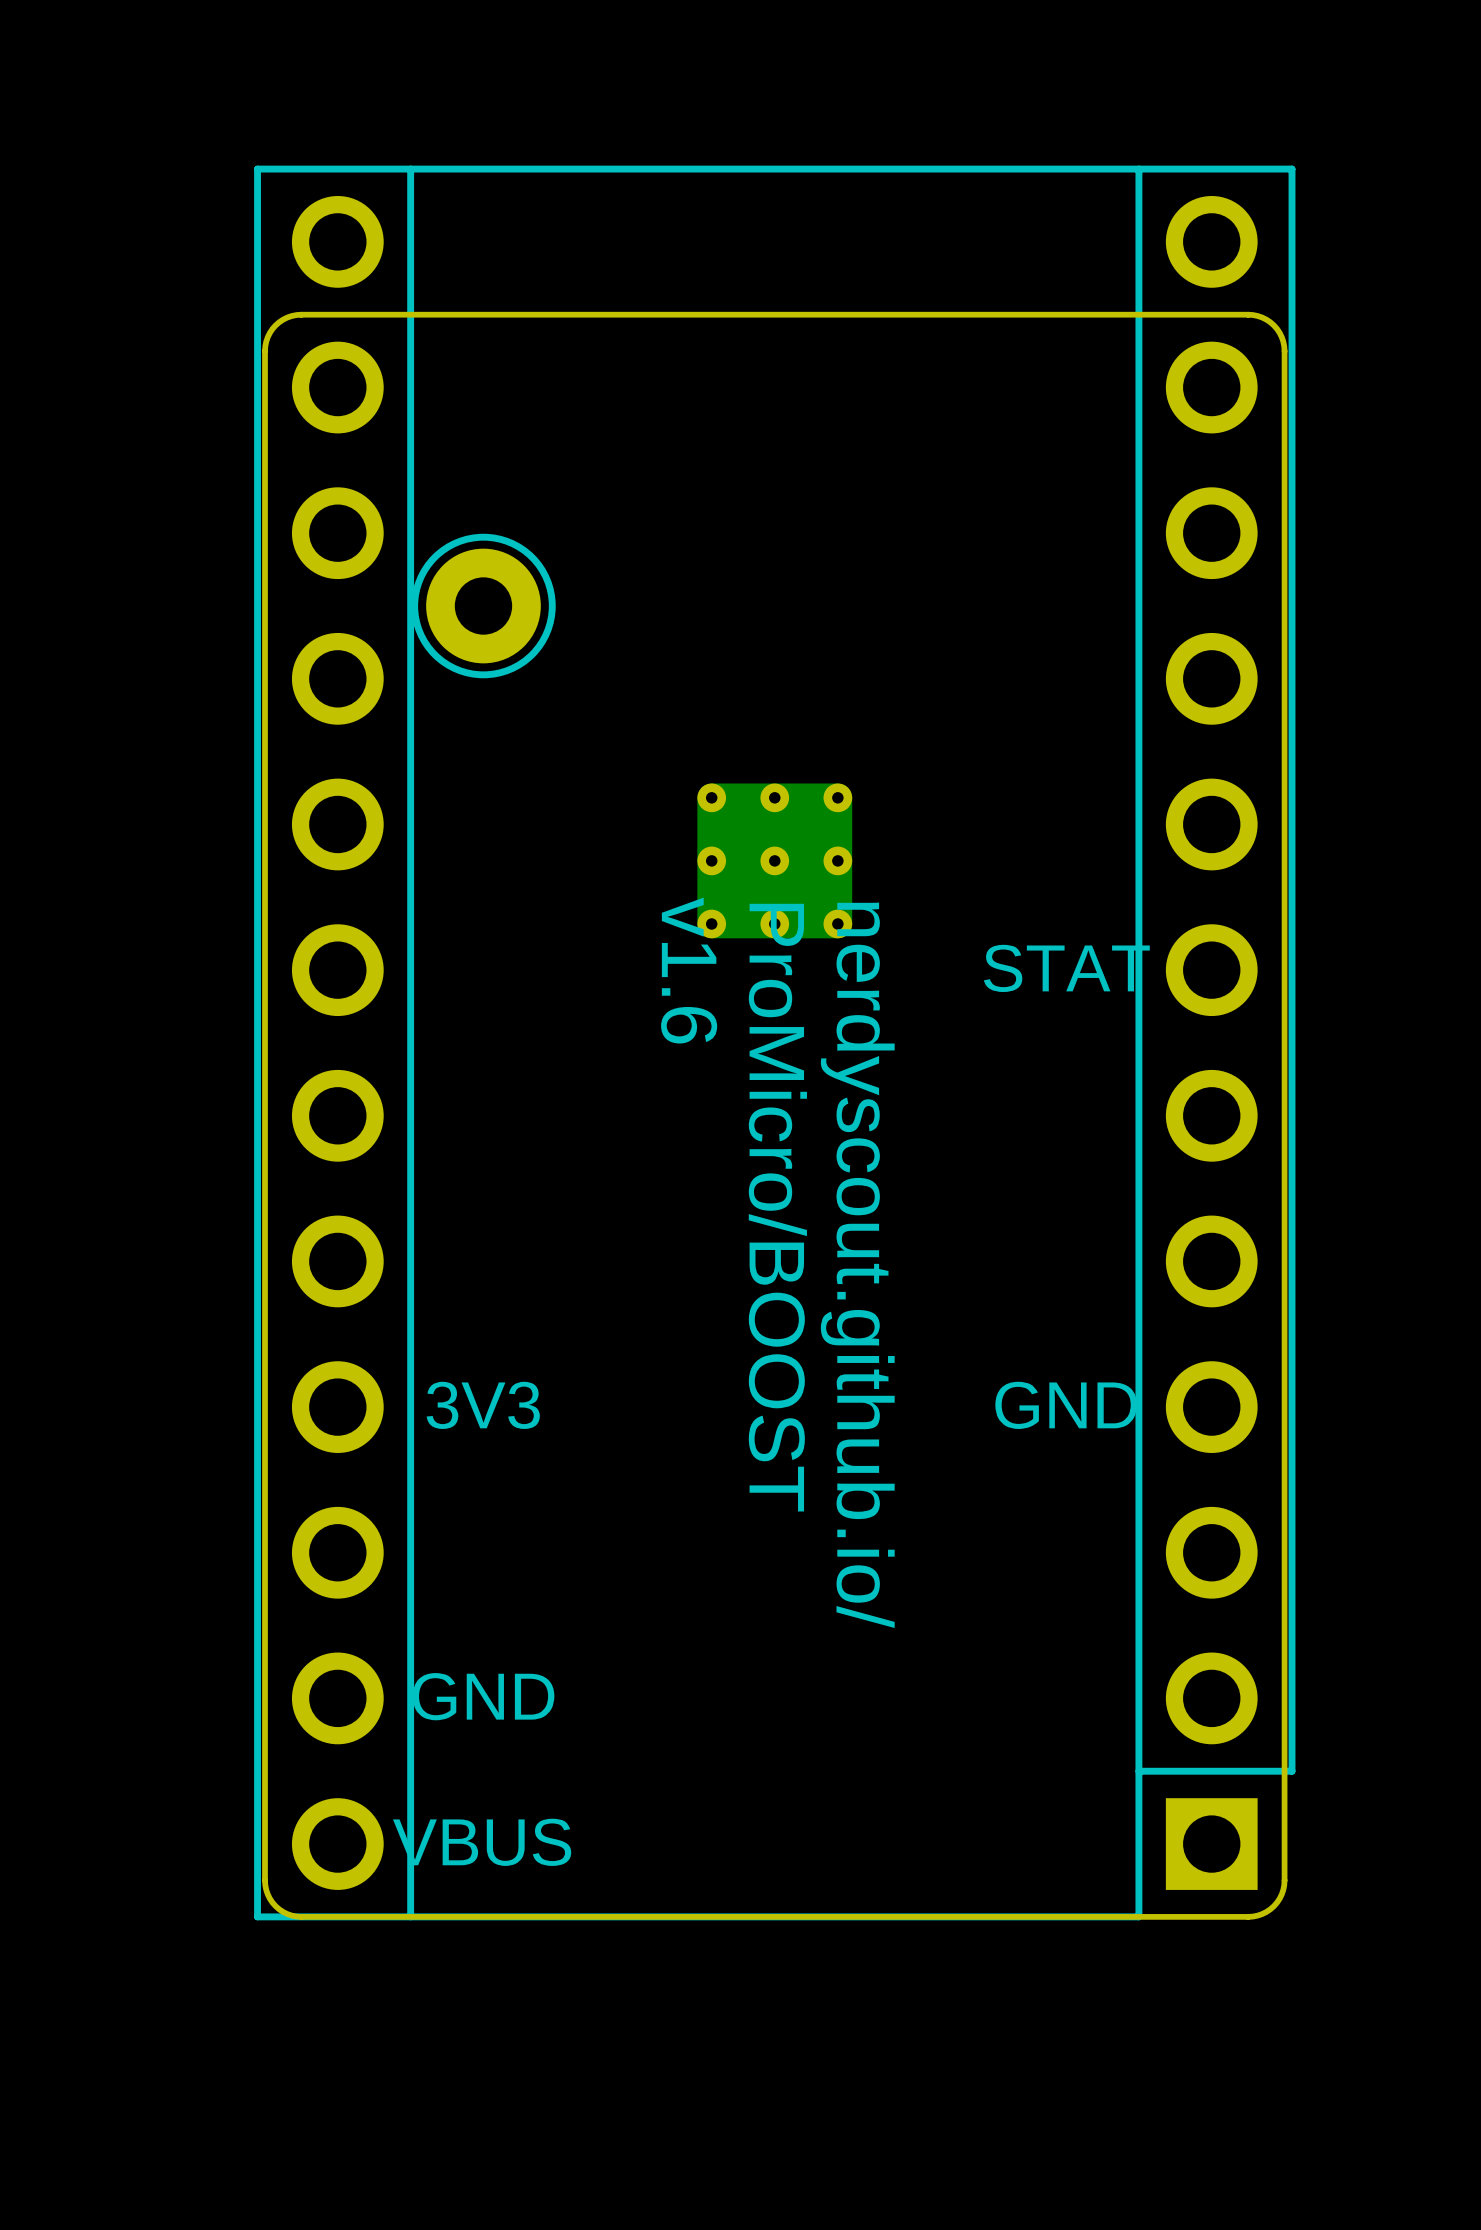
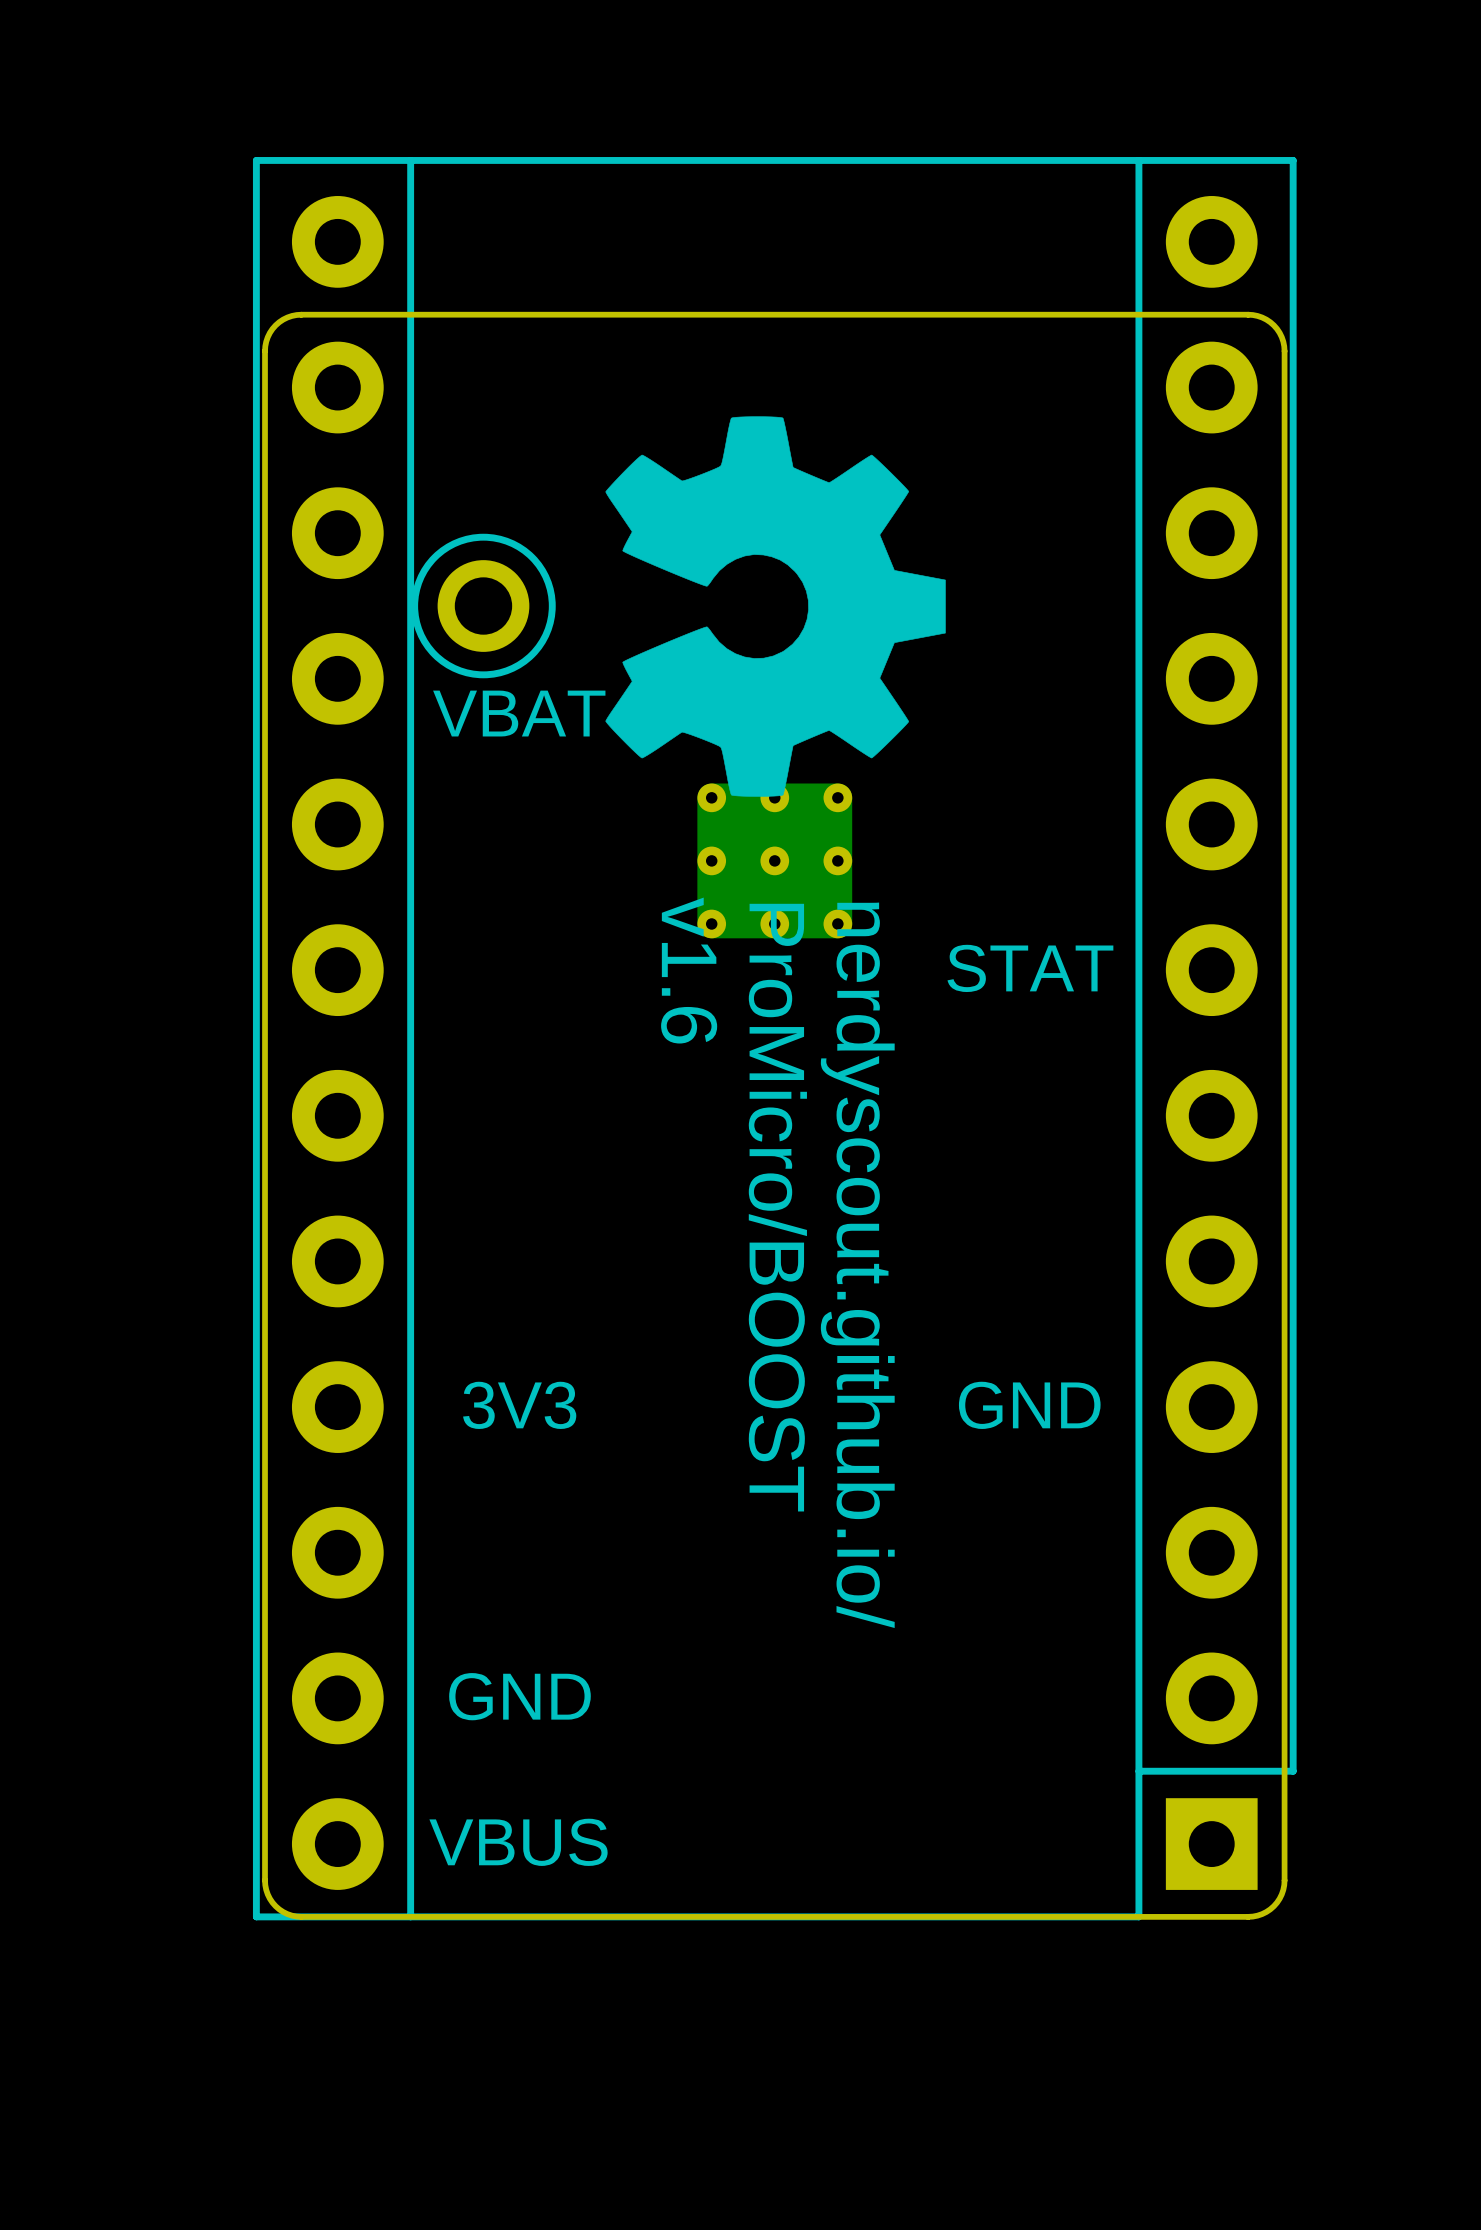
part footprint: [254, 165, 1296, 1921] -> [252, 157, 1297, 1921]
drawing: none -> [605, 416, 946, 797]
part footprint: [411, 533, 556, 679] -> [411, 533, 556, 679]
part value: none -> VBAT (519, 713)
text position: STAT (1066, 968) -> STAT (1030, 968)
text position: 3V3 (483, 1405) -> 3V3 (519, 1405)
text position: GND (1066, 1405) -> GND (1029, 1405)
text position: GND (483, 1696) -> GND (519, 1696)
text position: VBUS (482, 1842) -> VBUS (518, 1842)

